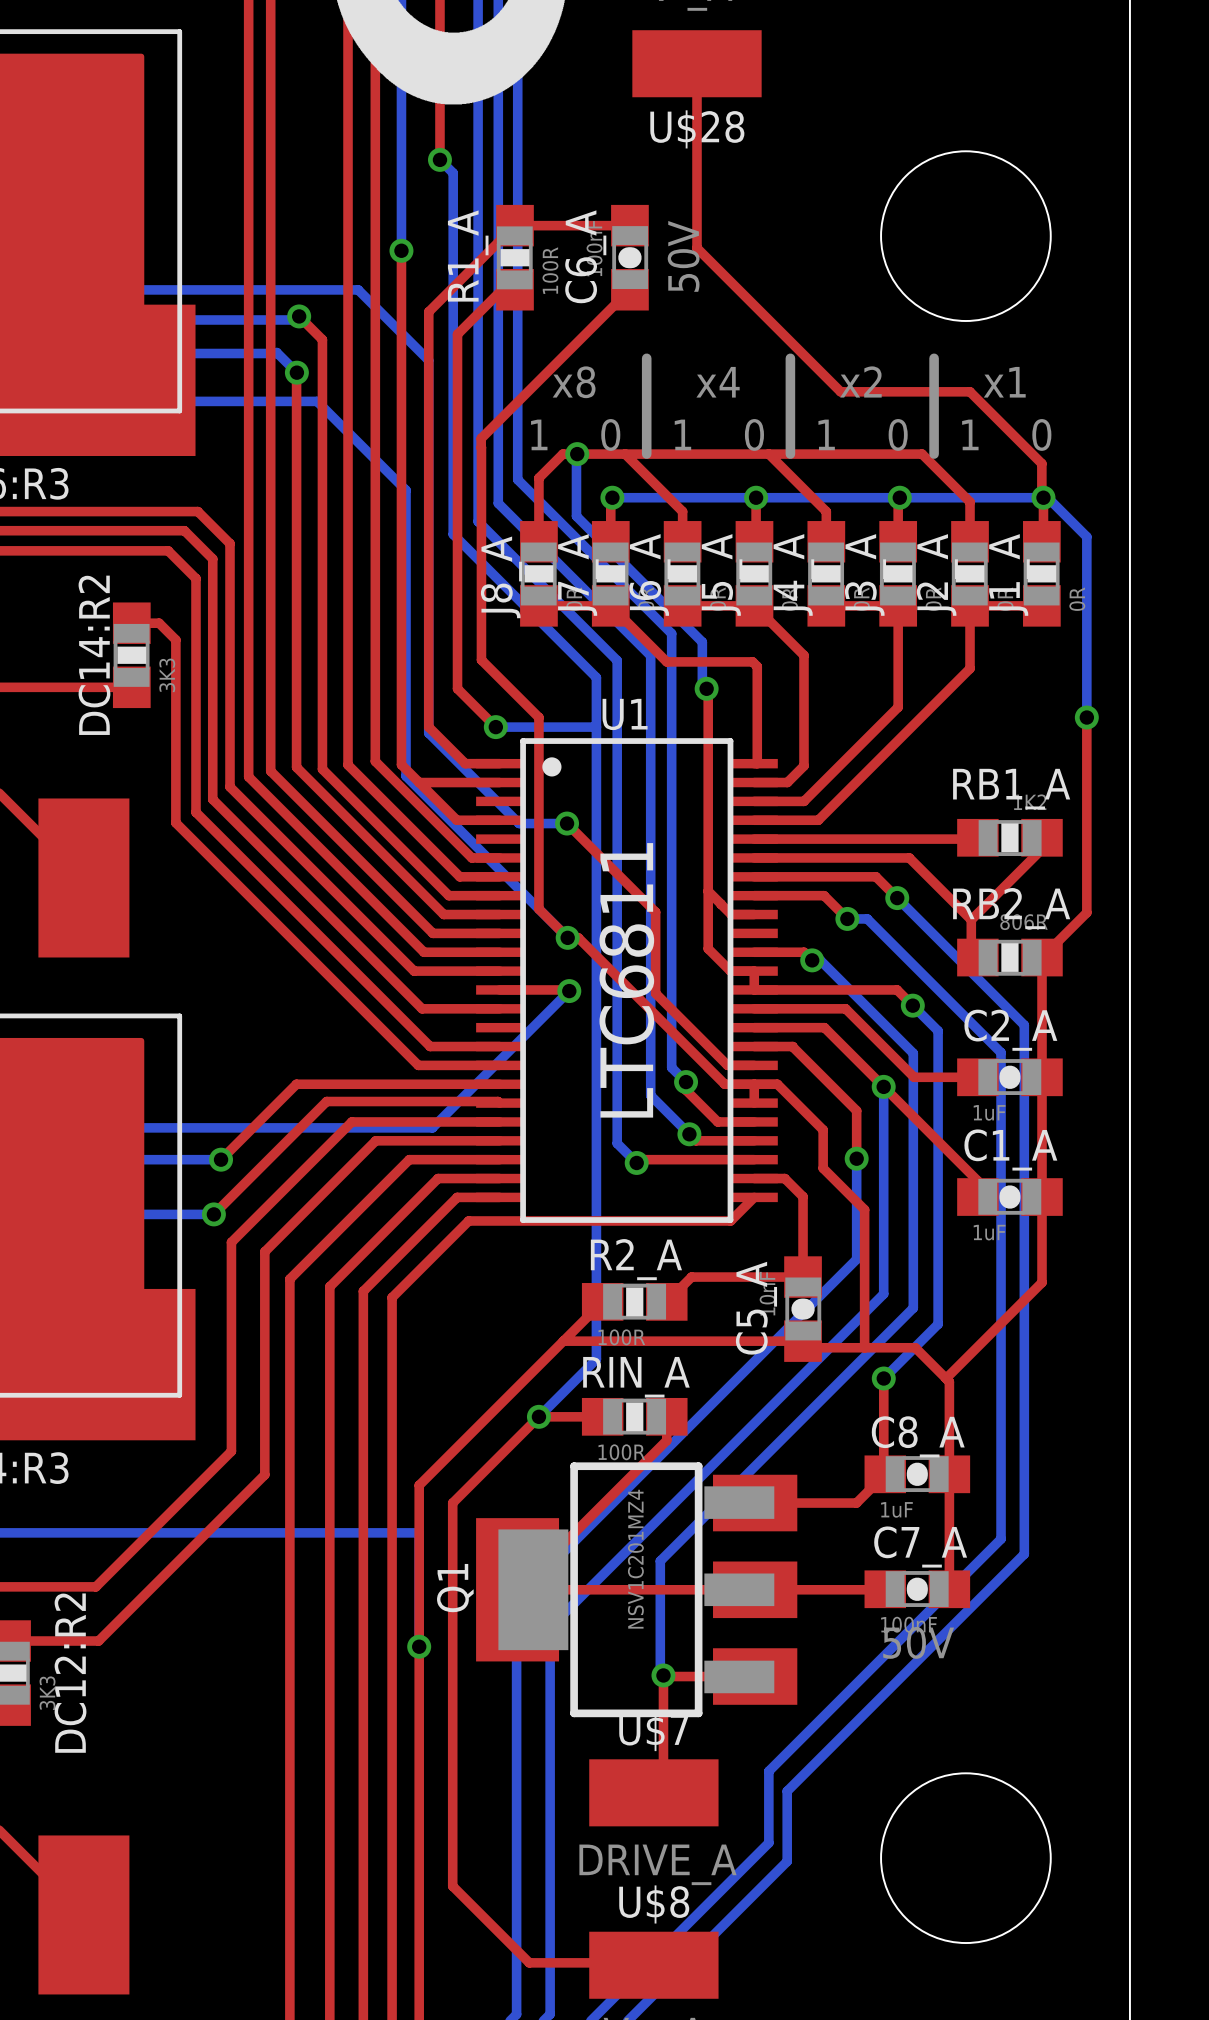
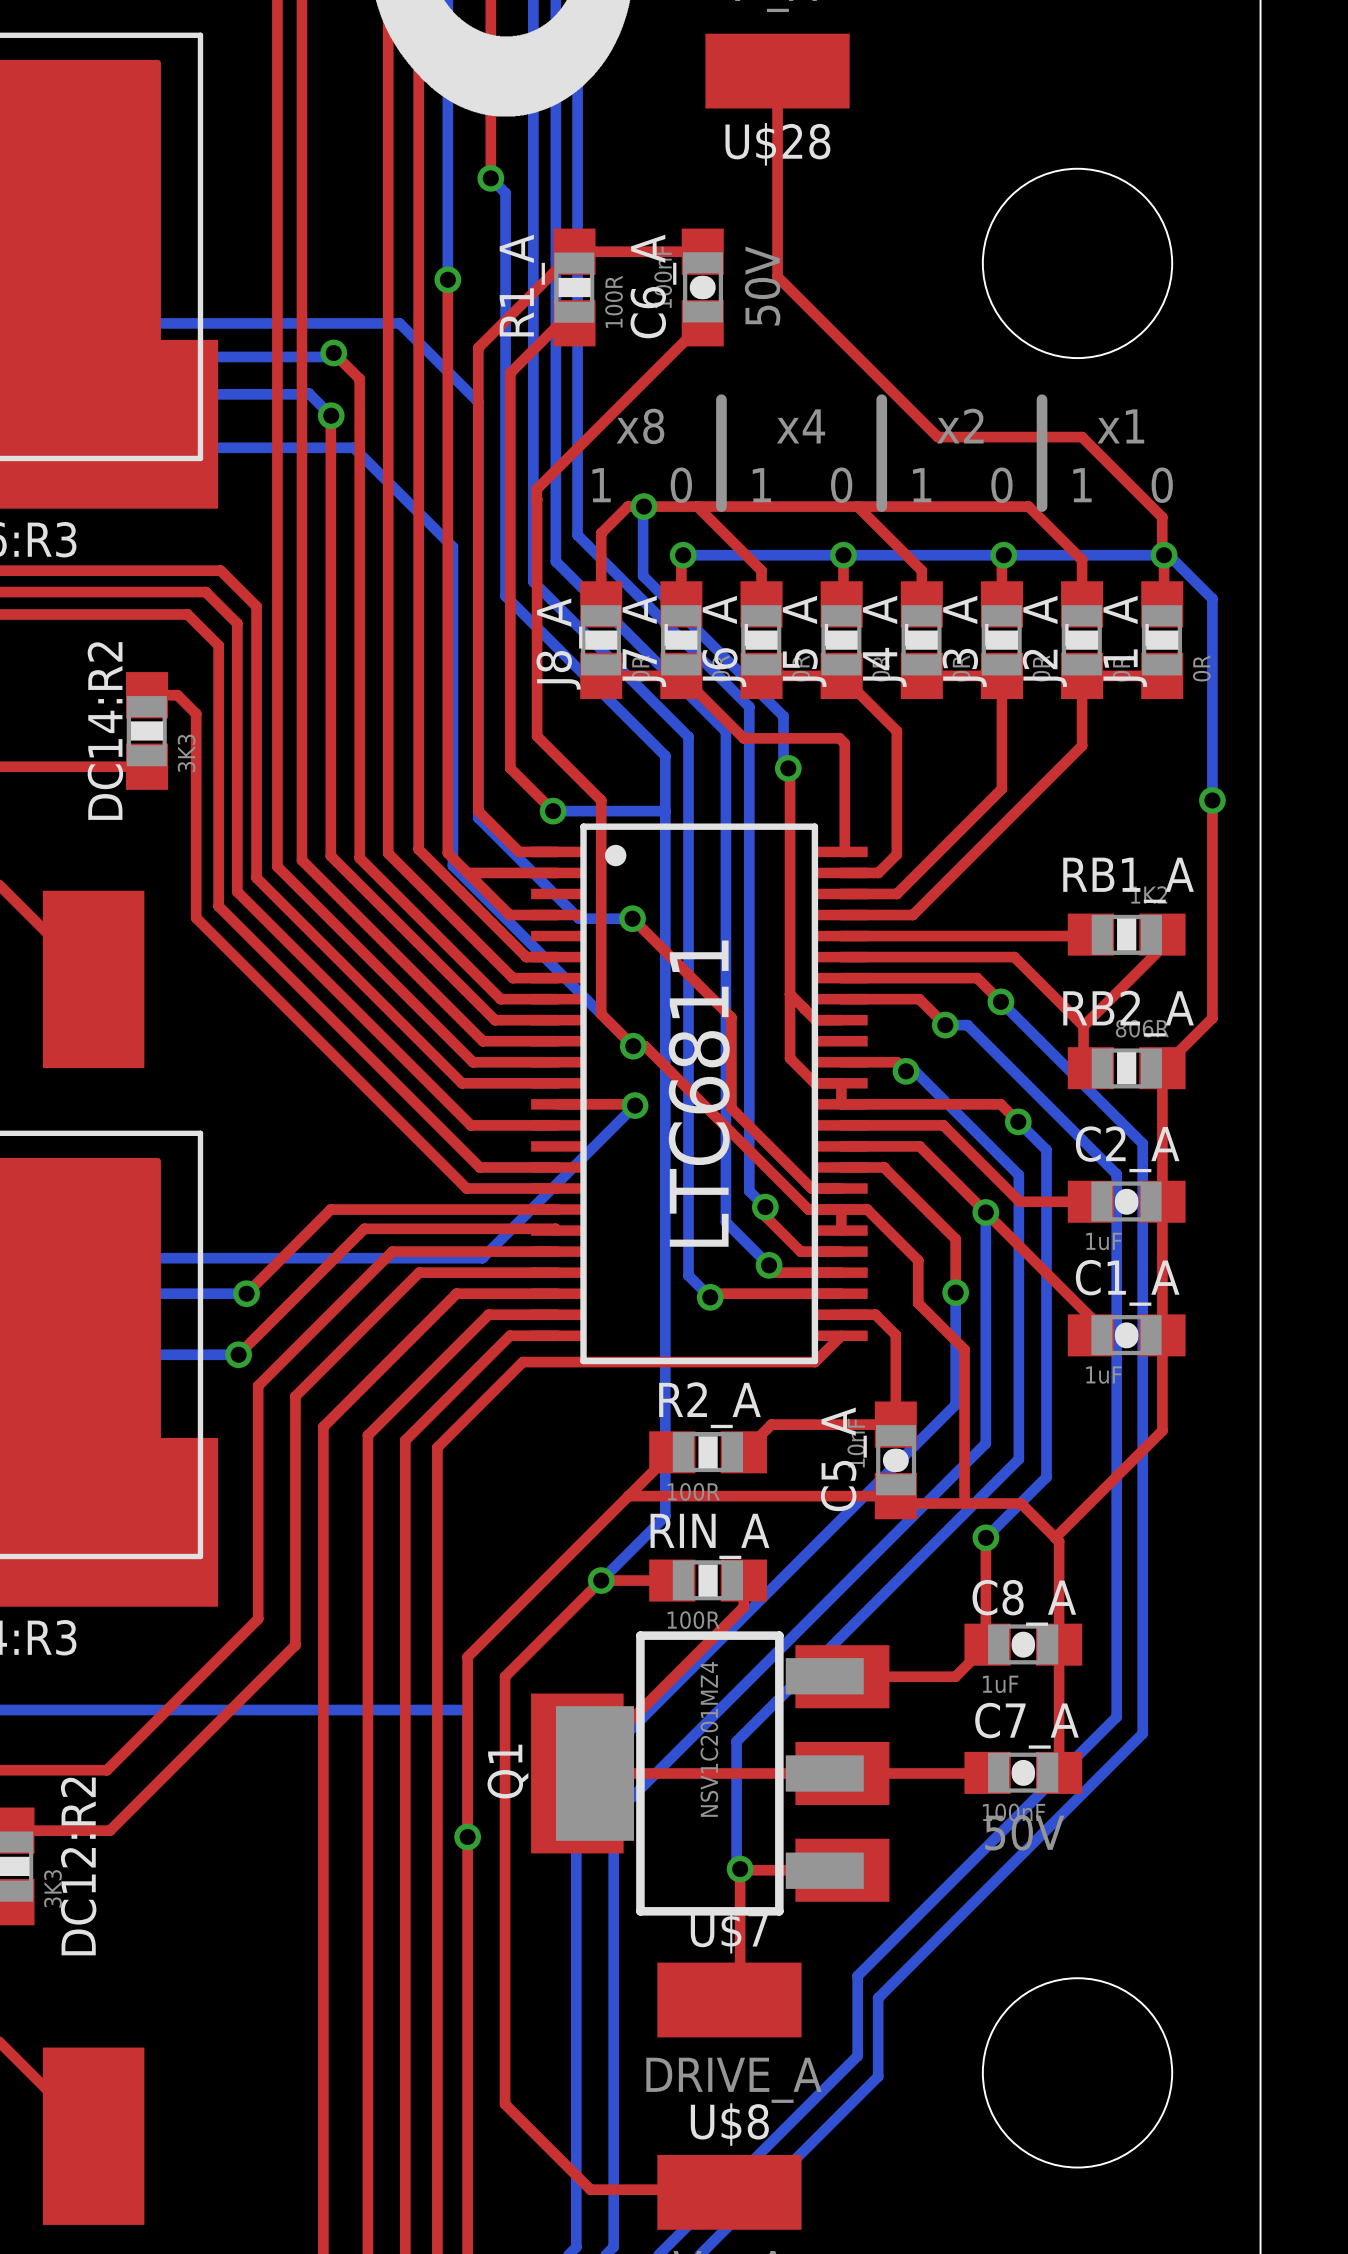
text: U1 (625, 714) -> none

